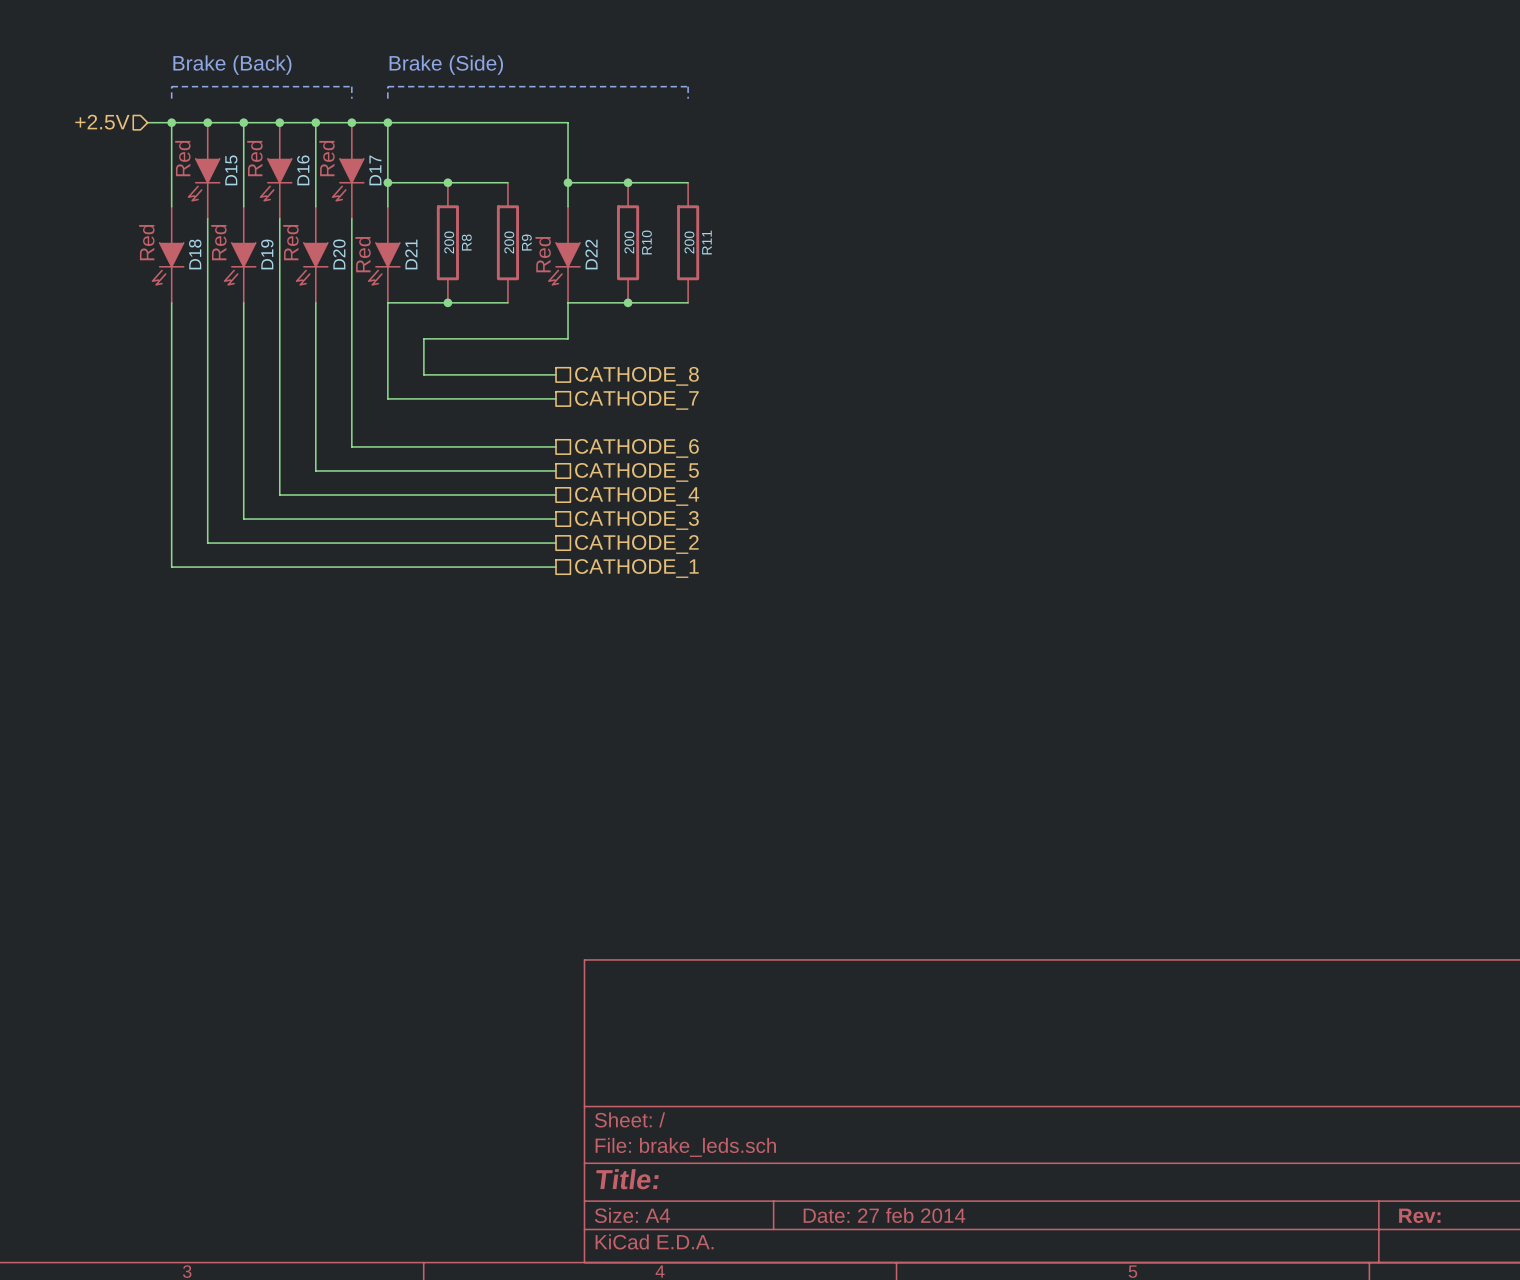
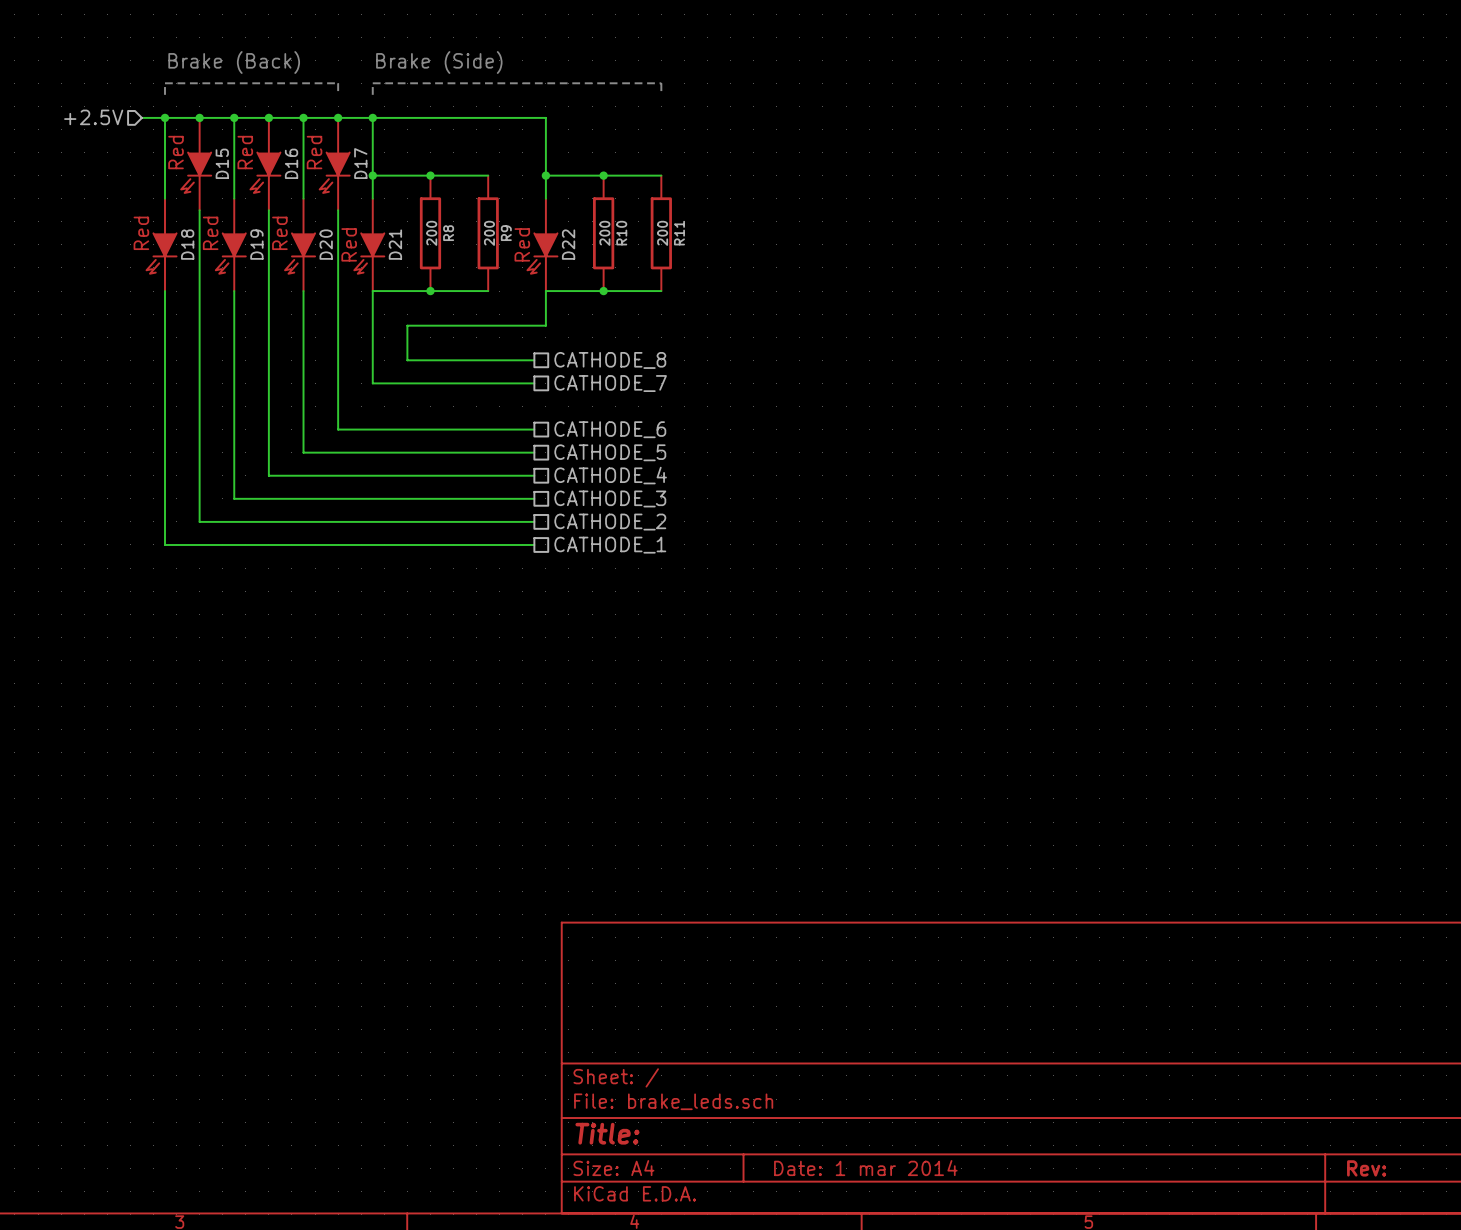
title block: Date: 27 feb 2014 (884, 1215) -> Date: 1 mar 2014 (865, 1168)

